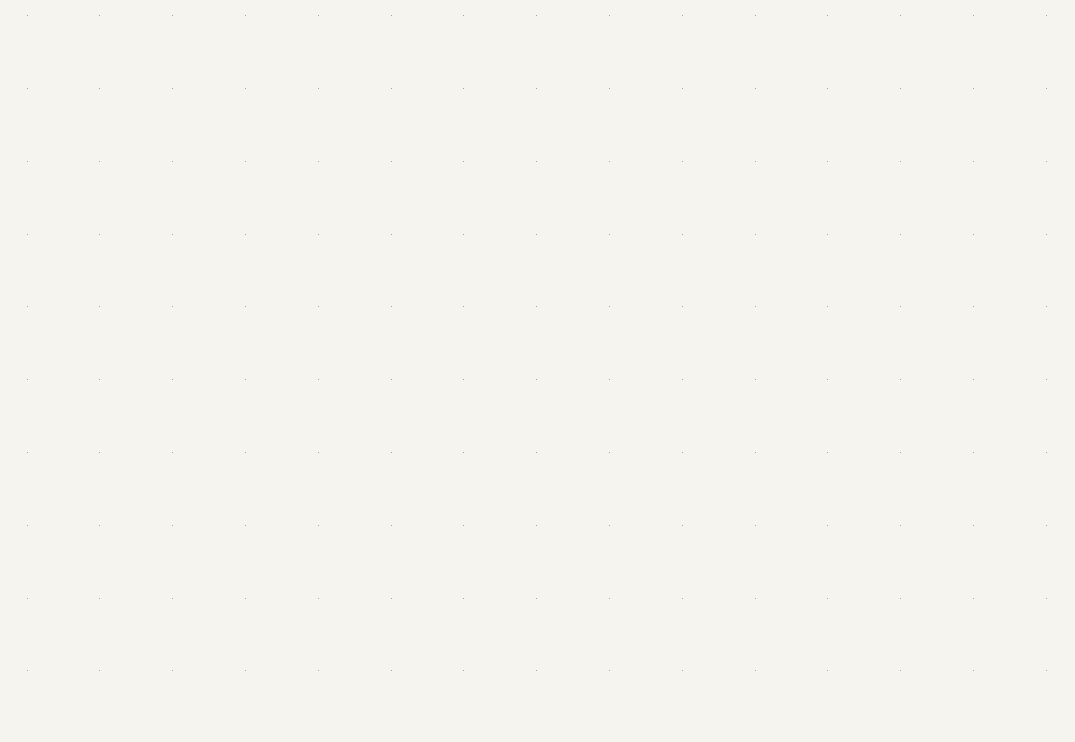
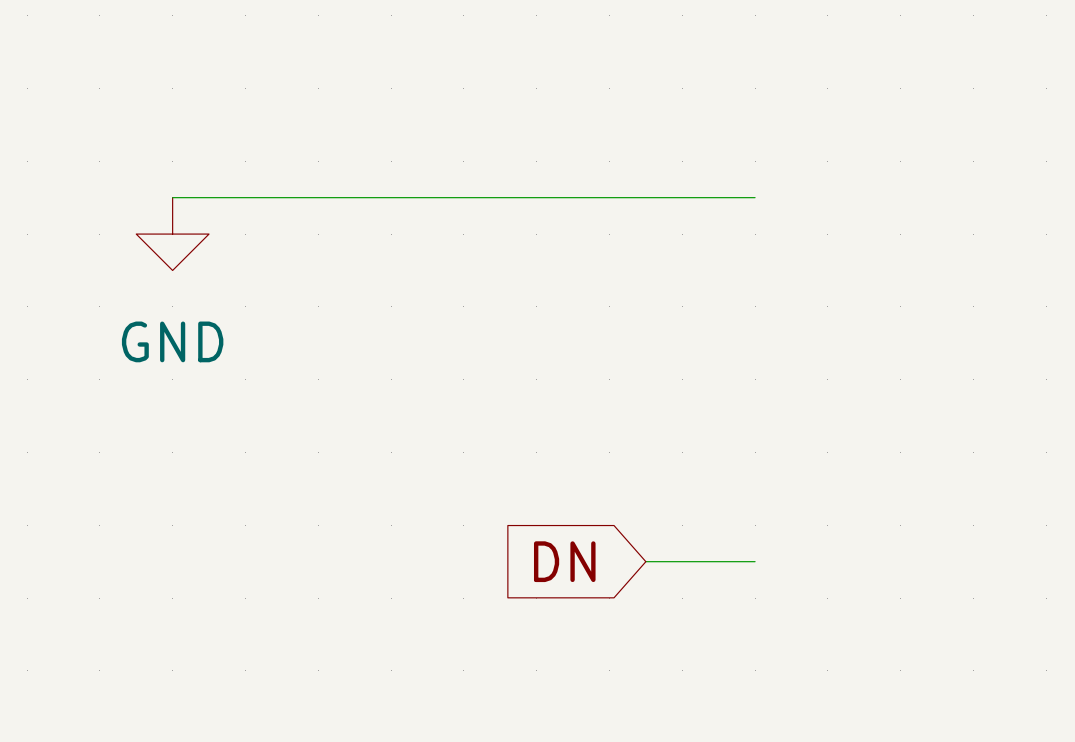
wire: none -> (172, 197) (755, 197)
power symbol: none -> GND (172, 234)
global label: none -> DN (564, 561)
wire: none -> (645, 561) (755, 561)

